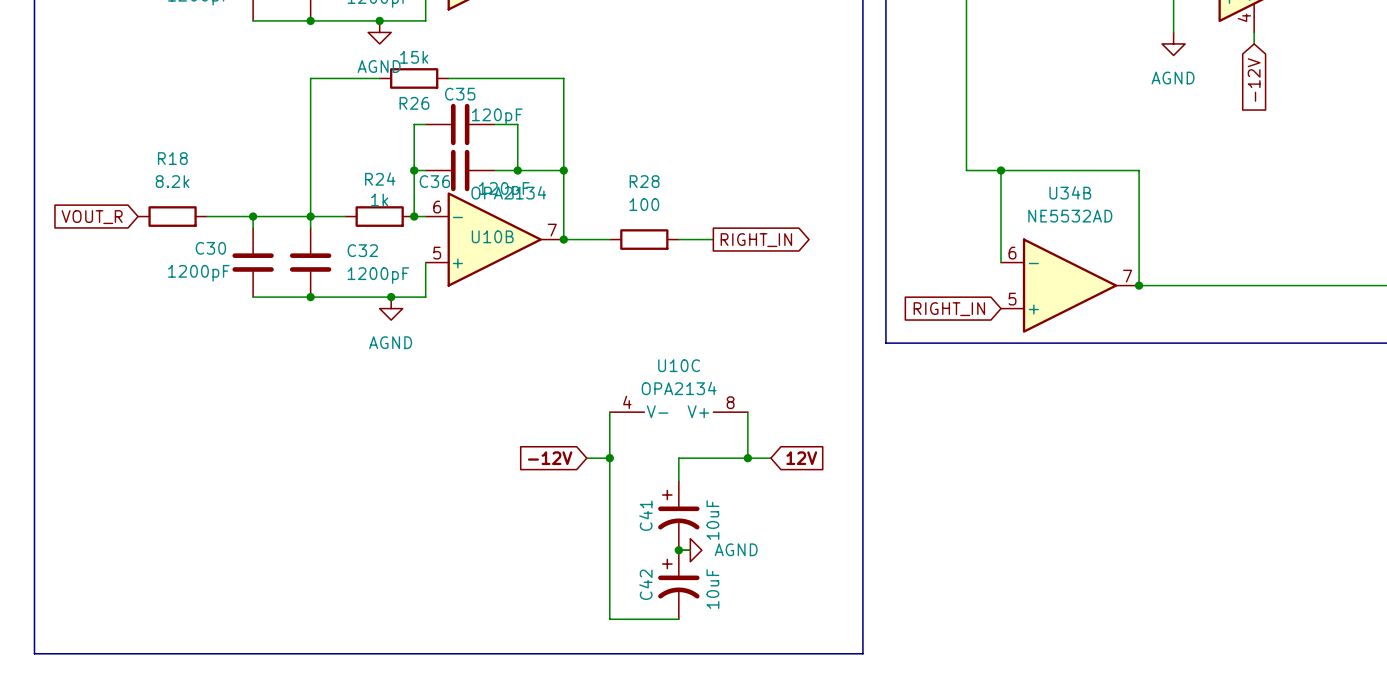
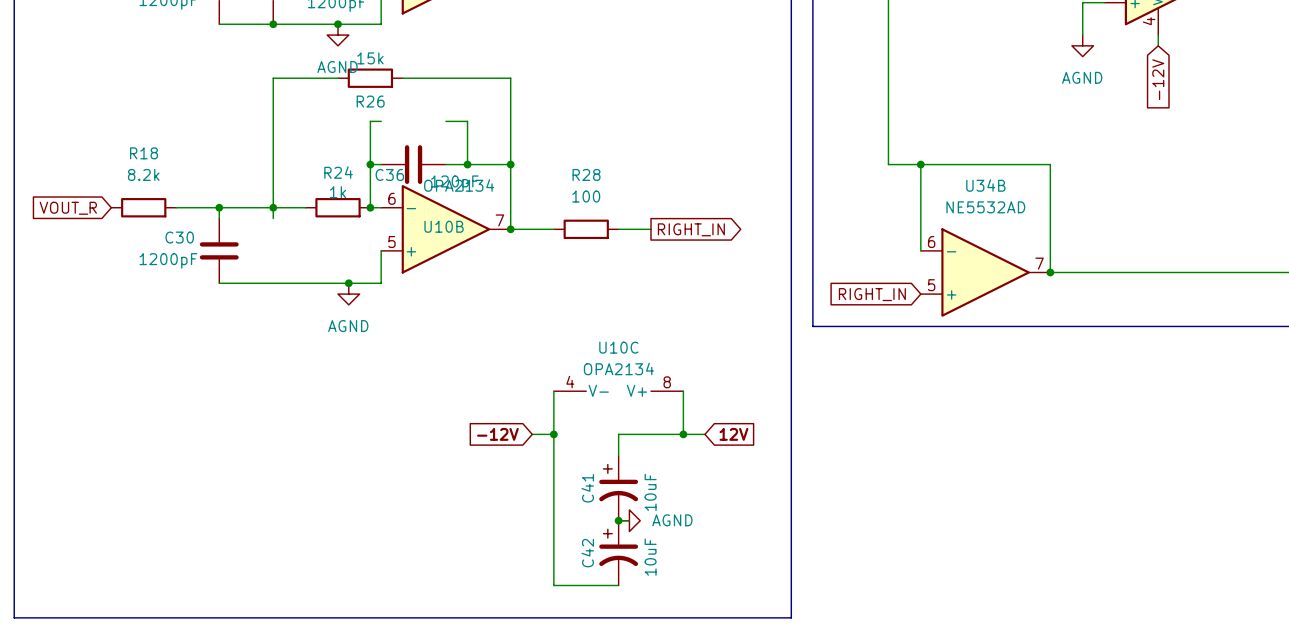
C35: 120pF (460, 124) -> none
C32: 1200pF (310, 262) -> none
junction: (310, 297) -> none

